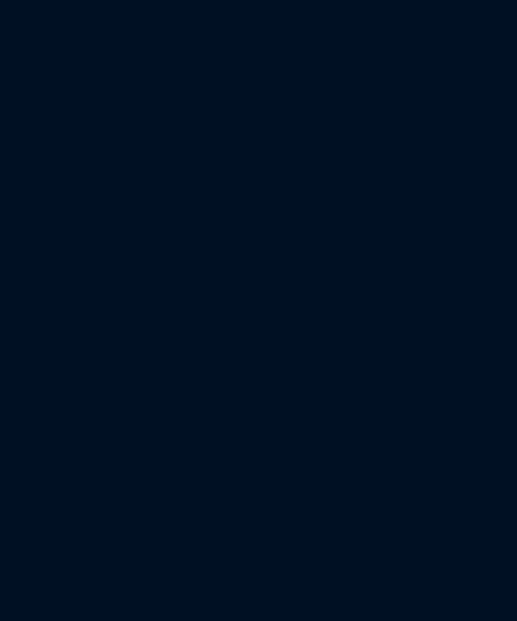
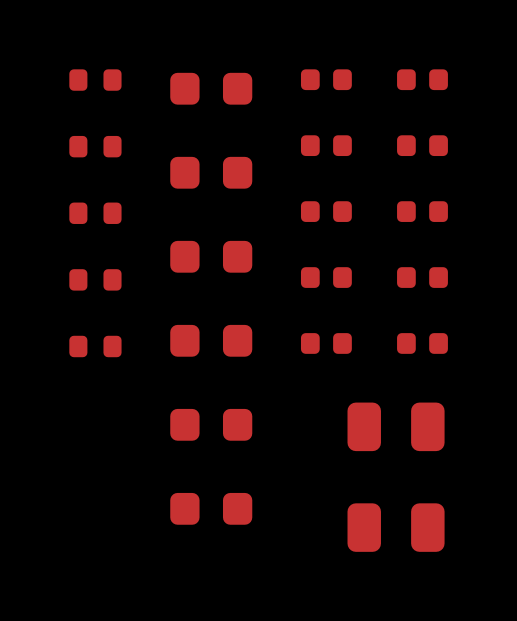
part: none -> (326, 79)
part: none -> (422, 79)
part: none -> (95, 80)
part: none -> (211, 88)
part: none -> (326, 145)
part: none -> (422, 145)
part: none -> (95, 146)
part: none -> (211, 172)
part: none -> (326, 211)
part: none -> (422, 211)
part: none -> (95, 213)
part: none -> (211, 256)
part: none -> (326, 277)
part: none -> (422, 277)
part: none -> (95, 279)
part: none -> (211, 340)
part: none -> (326, 343)
part: none -> (422, 343)
part: none -> (95, 346)
part: none -> (211, 424)
part: none -> (396, 426)
part: none -> (211, 508)
part: none -> (396, 527)

